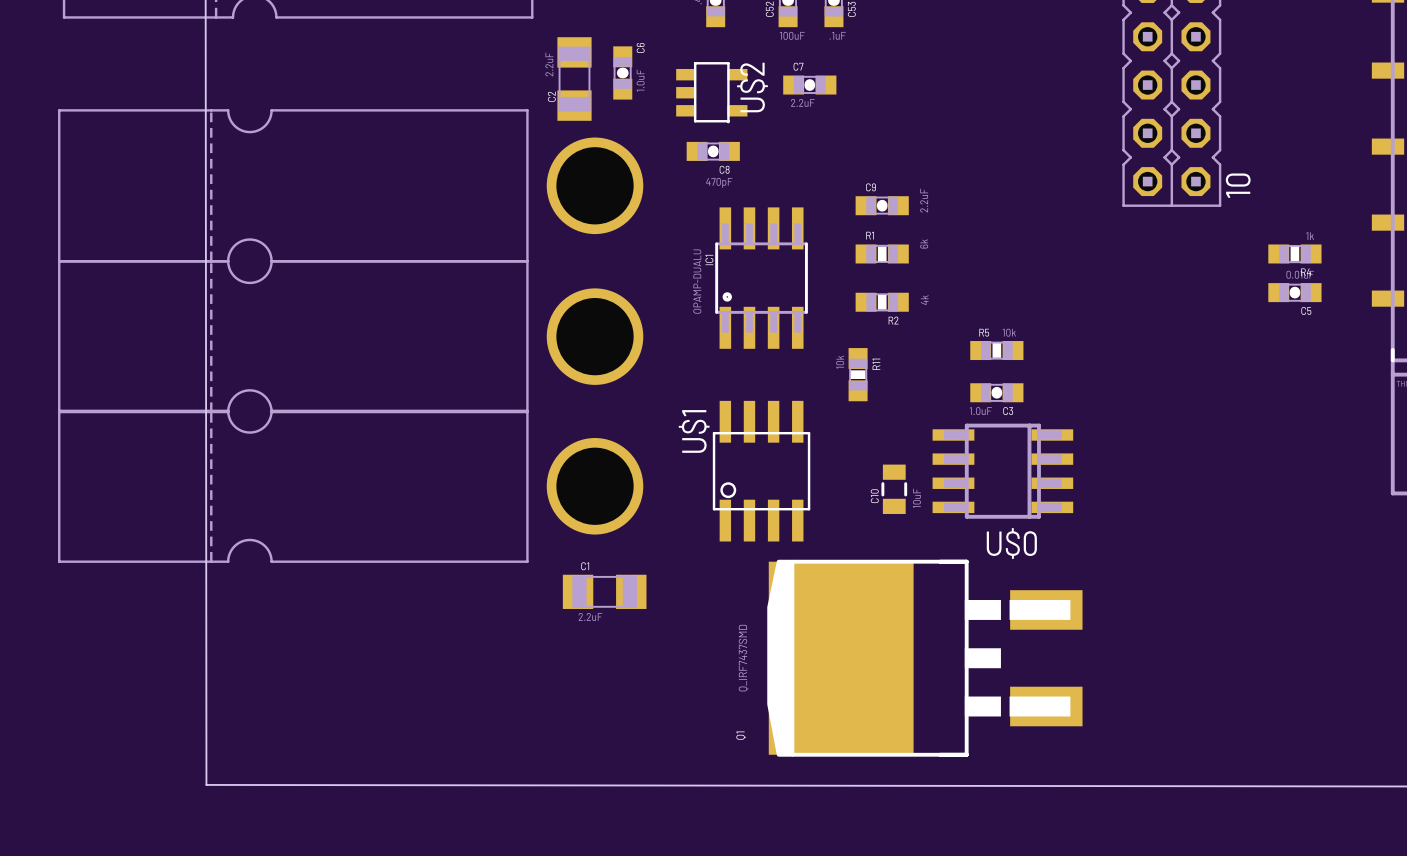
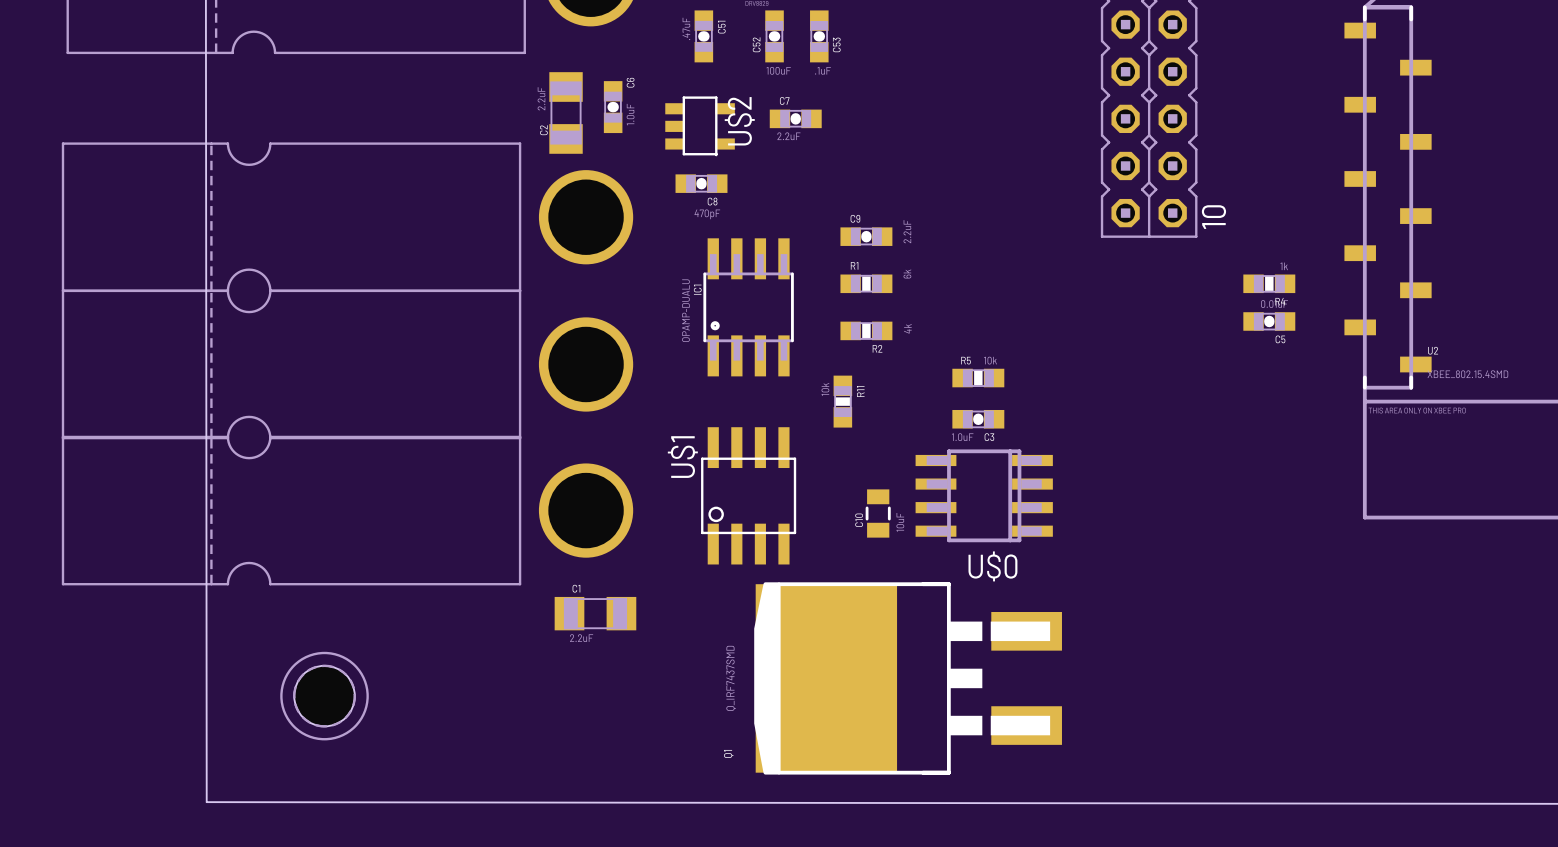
part: none -> (324, 696)

